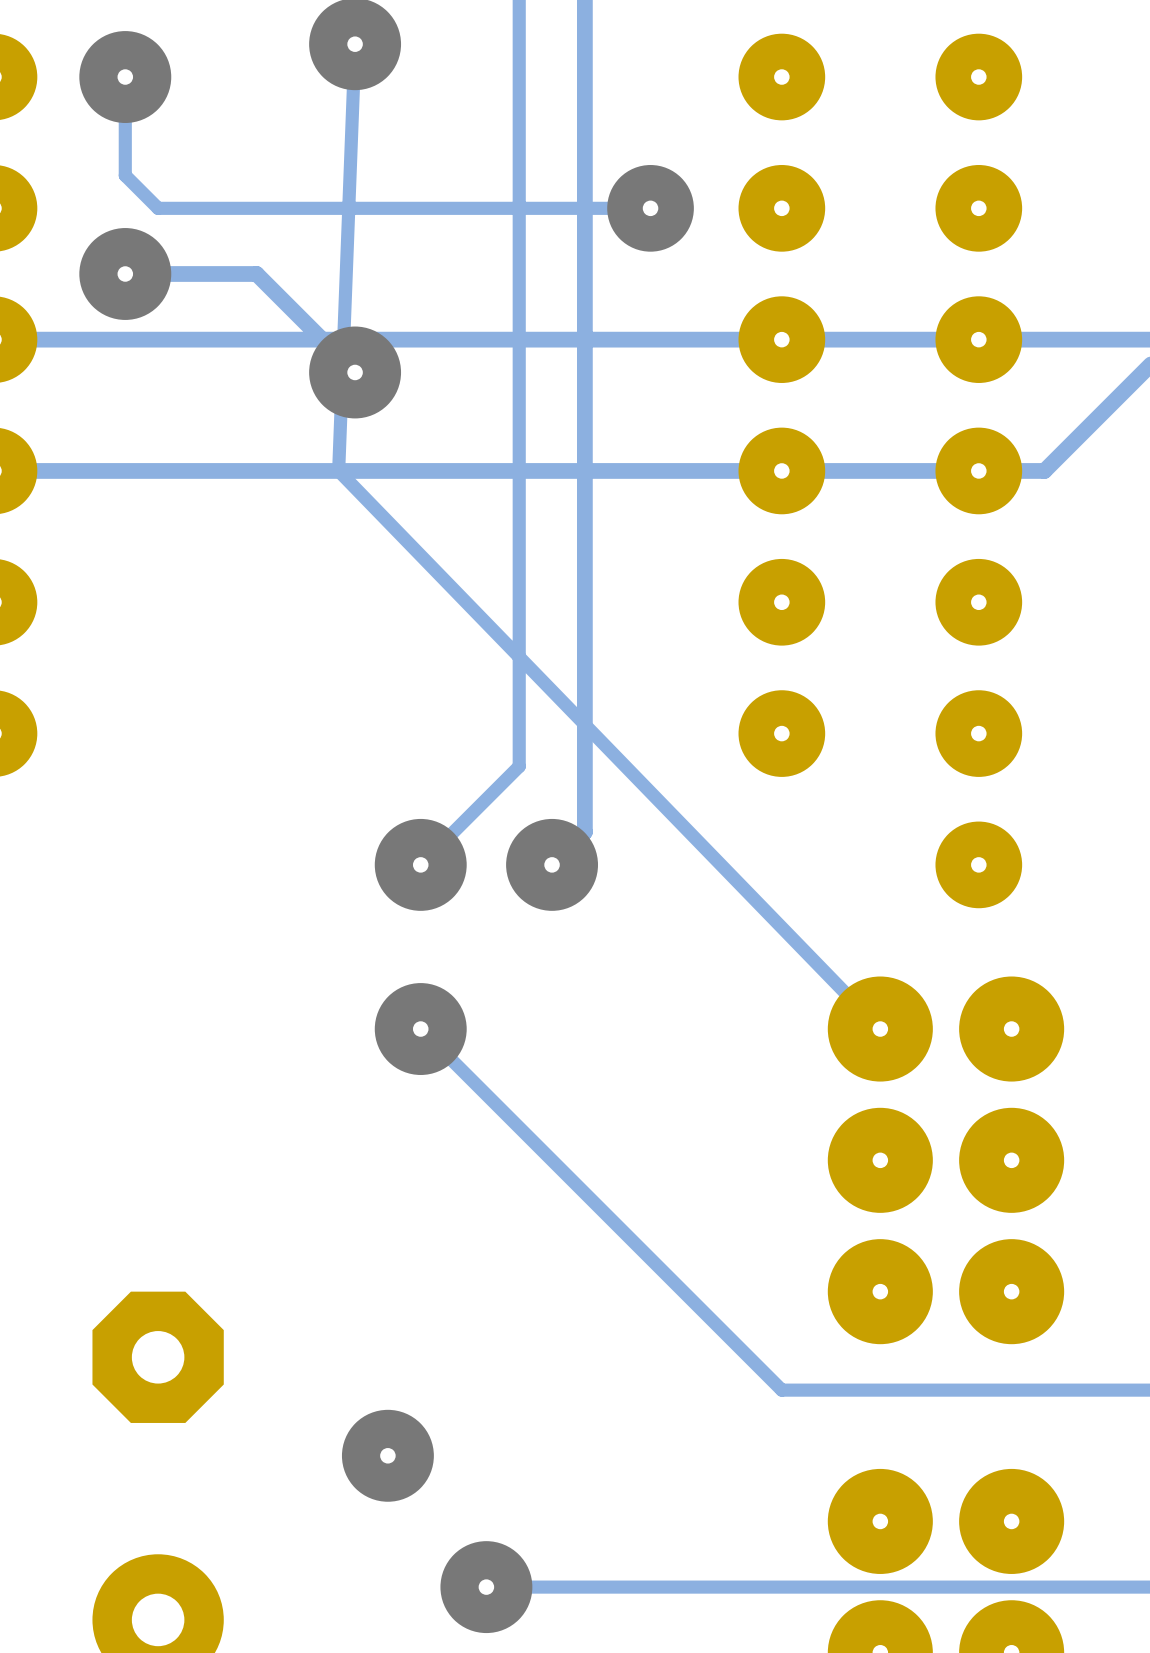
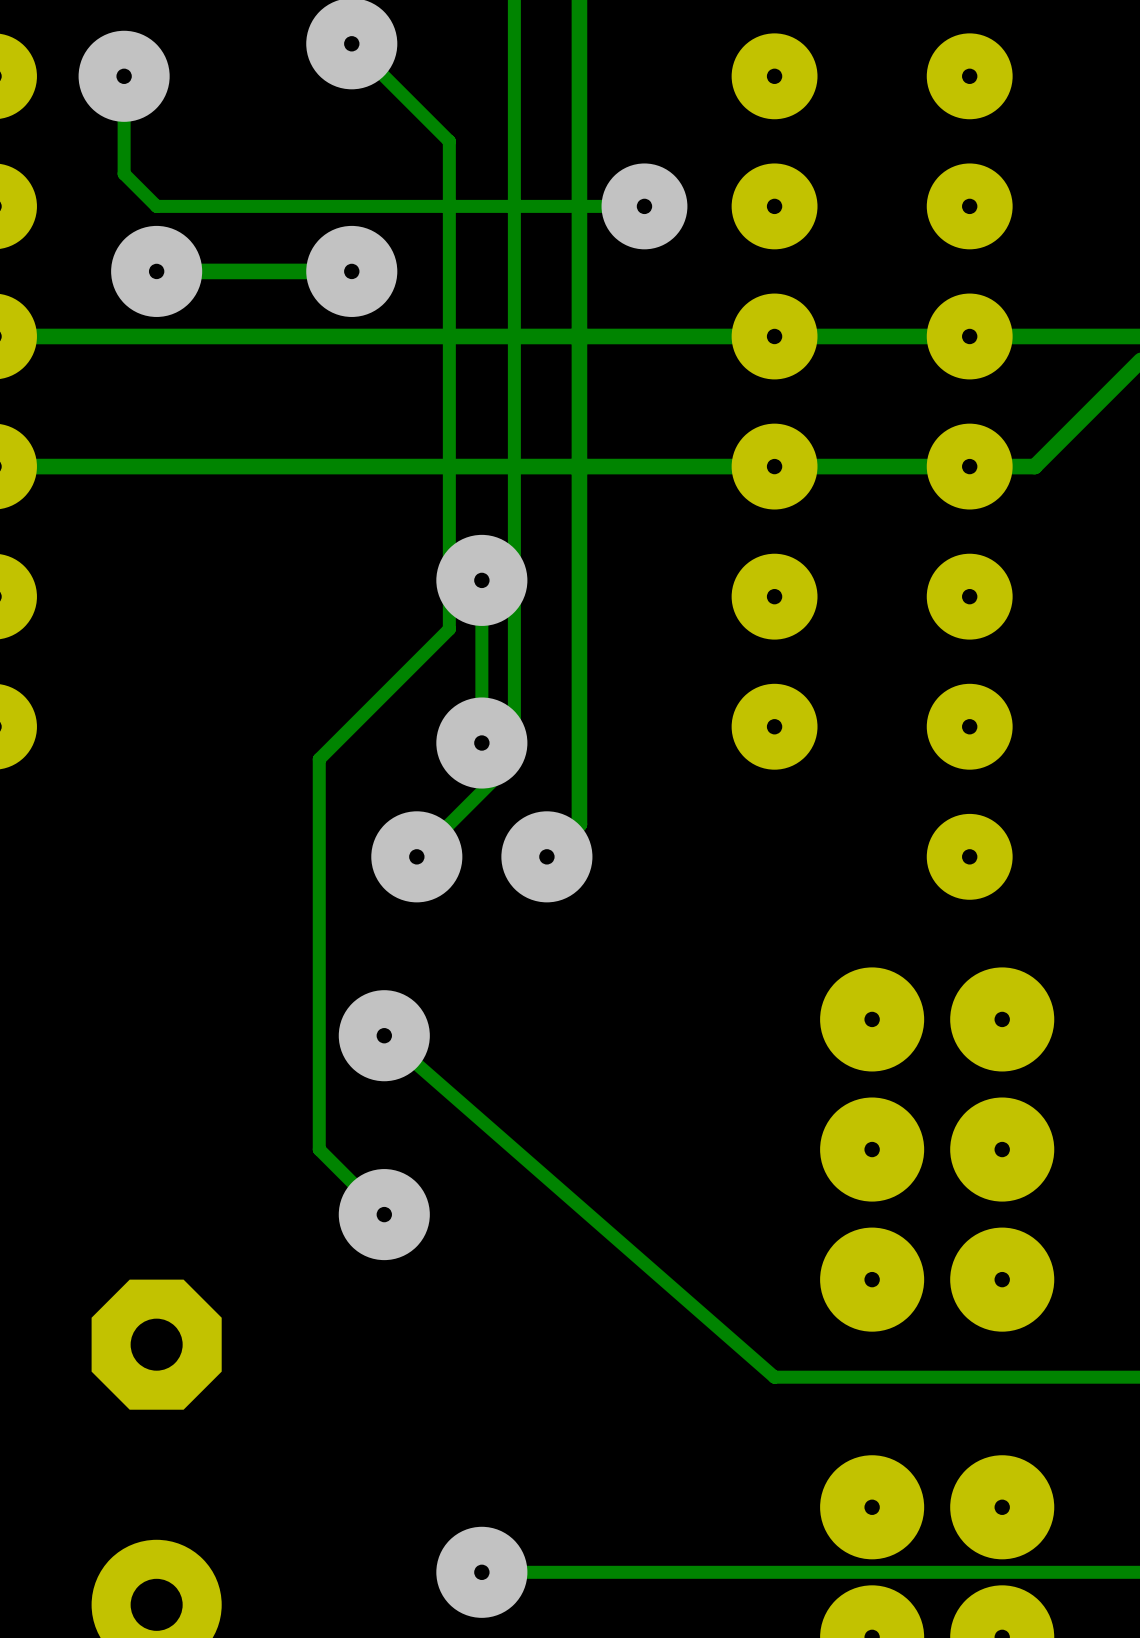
track: (355, 44) (338, 470) (880, 1029) -> (351, 43) (449, 141) (449, 629) (319, 759) (319, 1149) (384, 1214)
via position: (125, 273) -> (156, 271)
track: (256, 273) (355, 372) -> (254, 271) (351, 271)
via position: (355, 372) -> (351, 271)
track: none -> (481, 580) (481, 743)
via: none -> (481, 580)
via: none -> (481, 743)
track: (420, 1029) (781, 1390) -> (384, 1035) (774, 1377)
via position: (420, 1029) -> (384, 1035)
via: none -> (384, 1214)
via: (387, 1455) -> none

